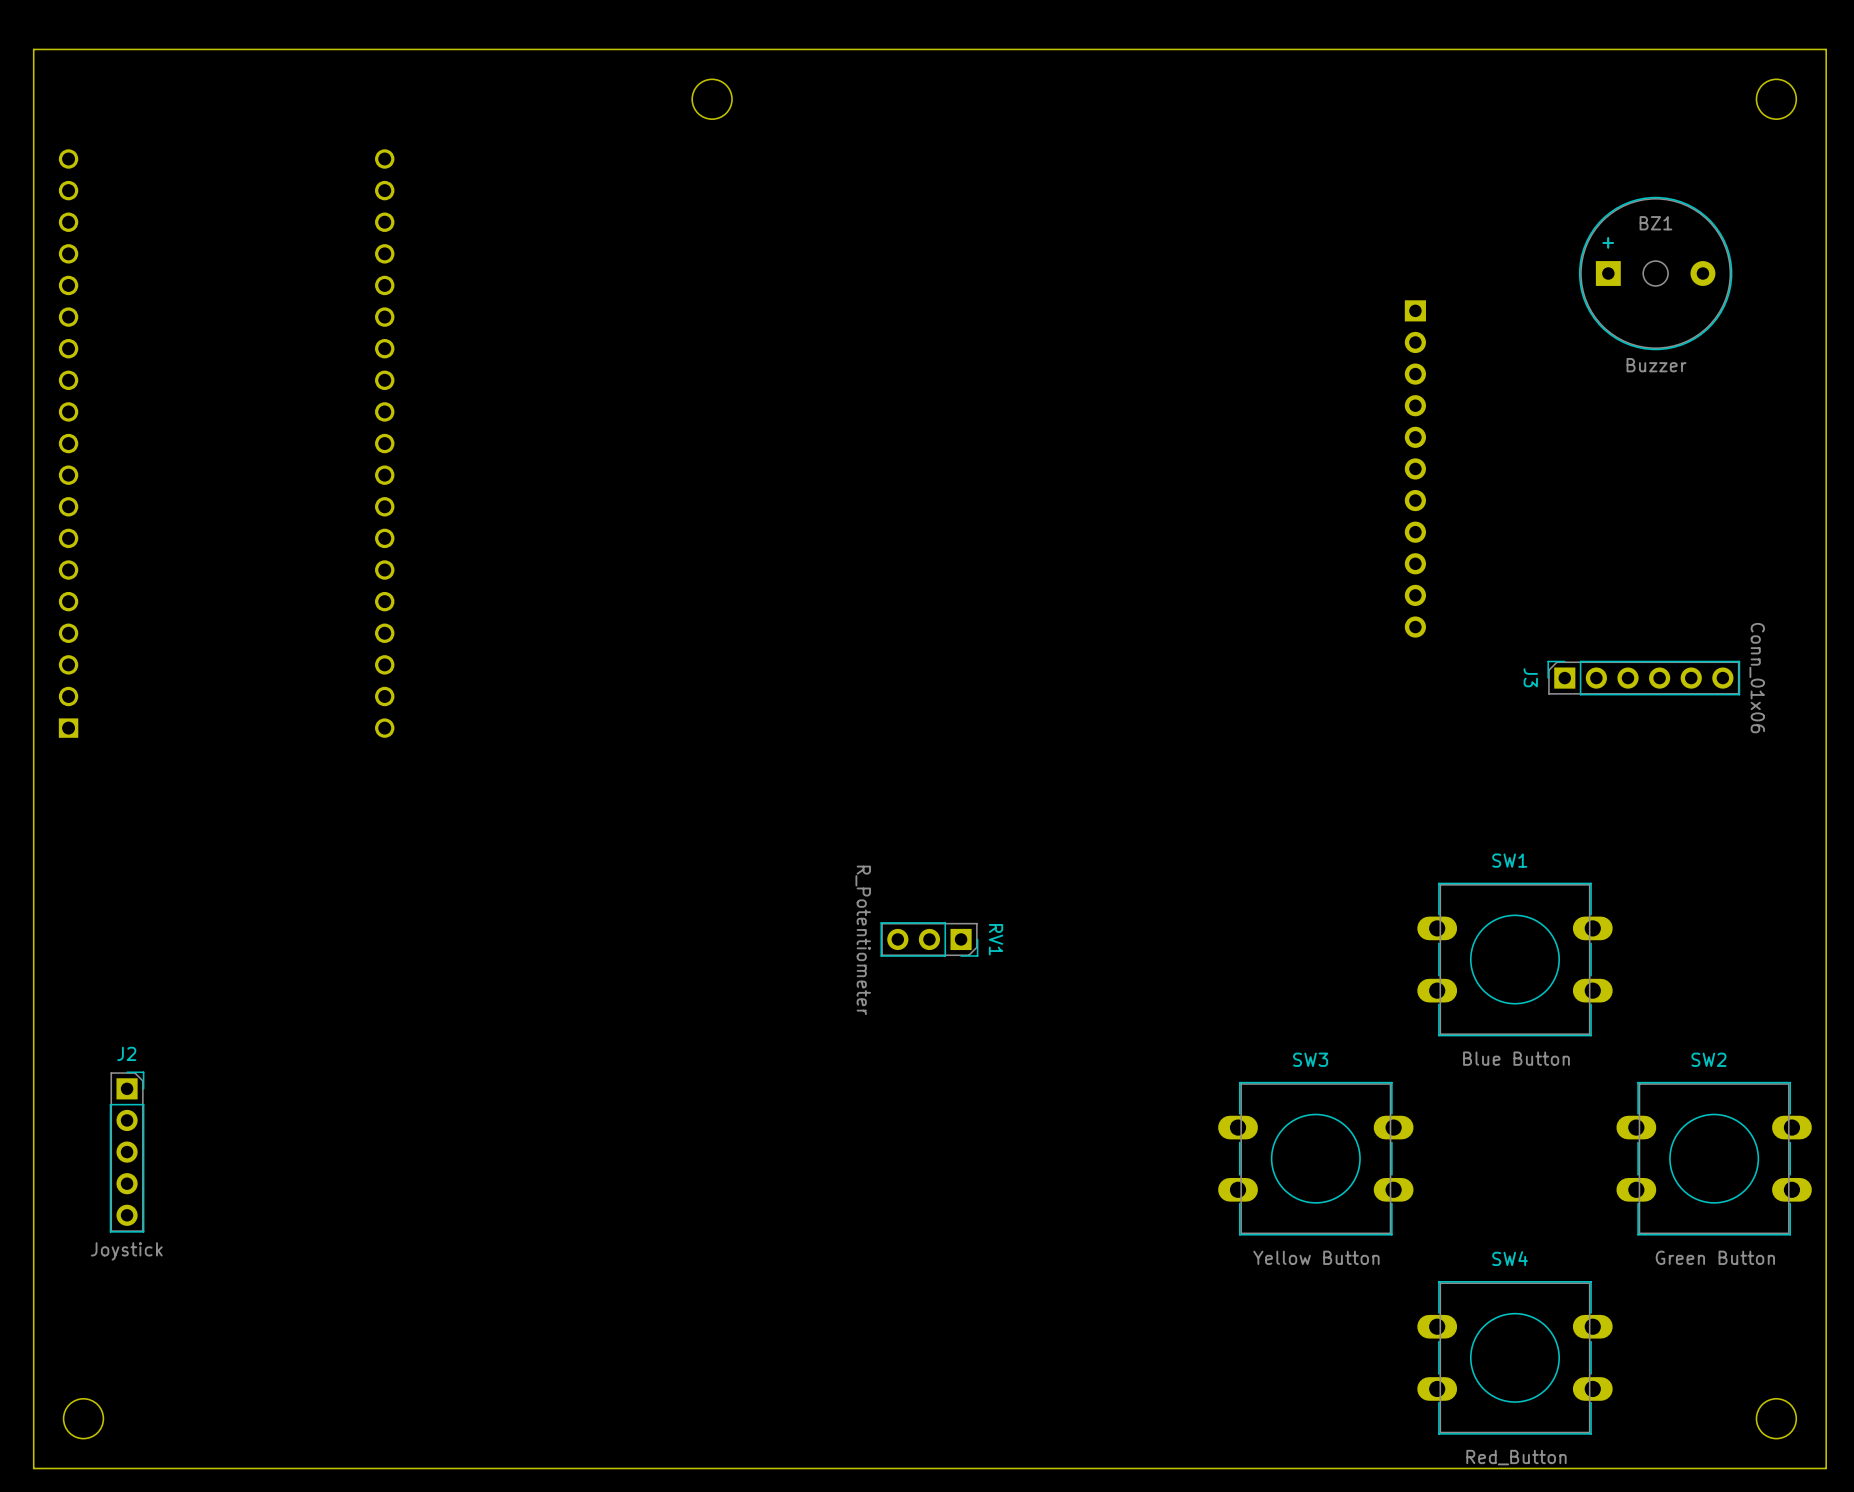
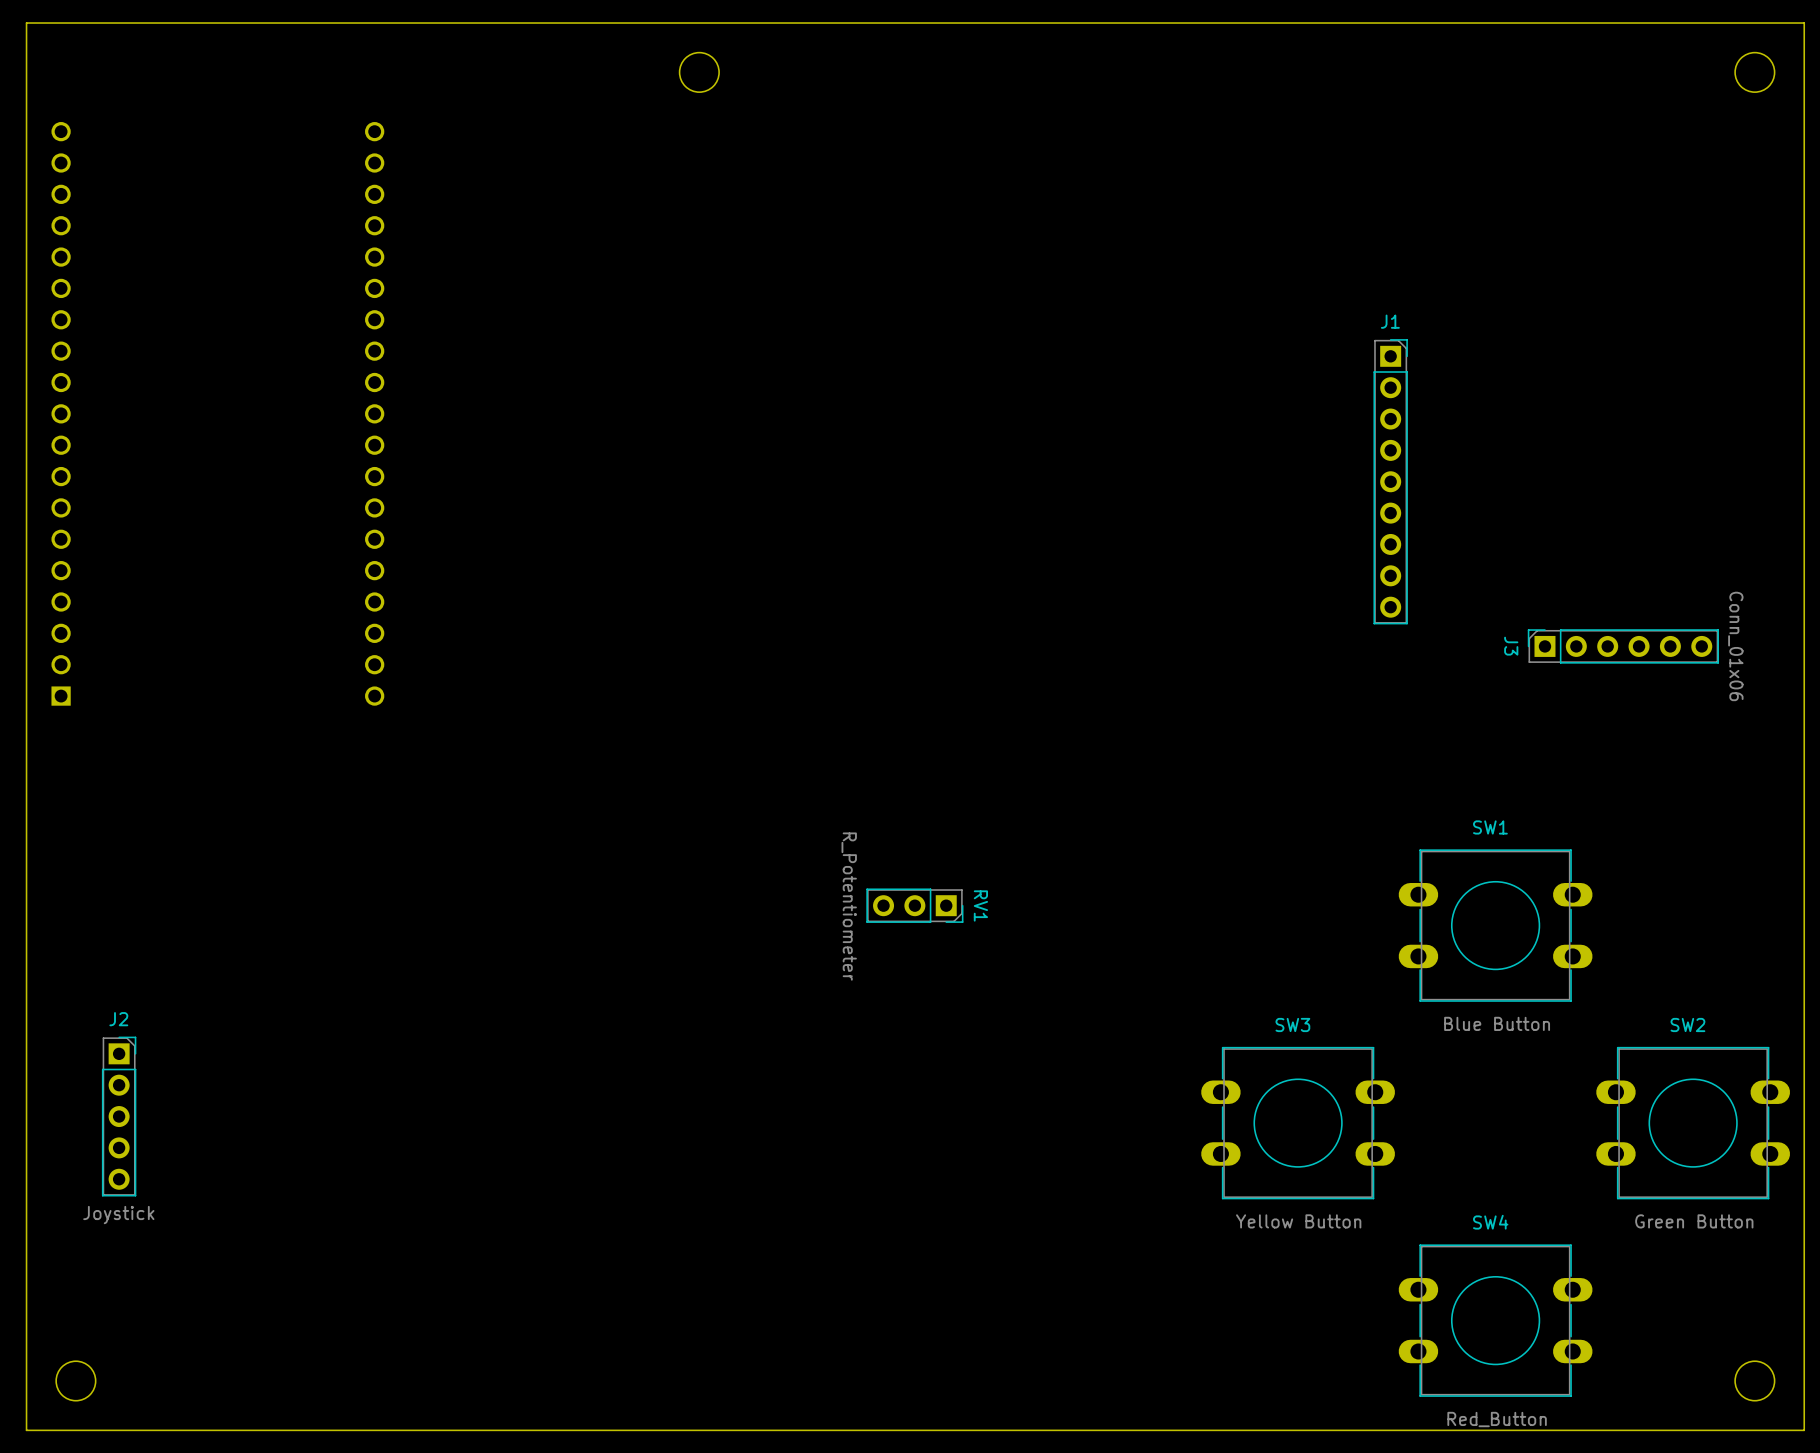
BZ1: Buzzer (1655, 273) -> none
part: (1415, 468) -> none
J1: none -> (1390, 481)

